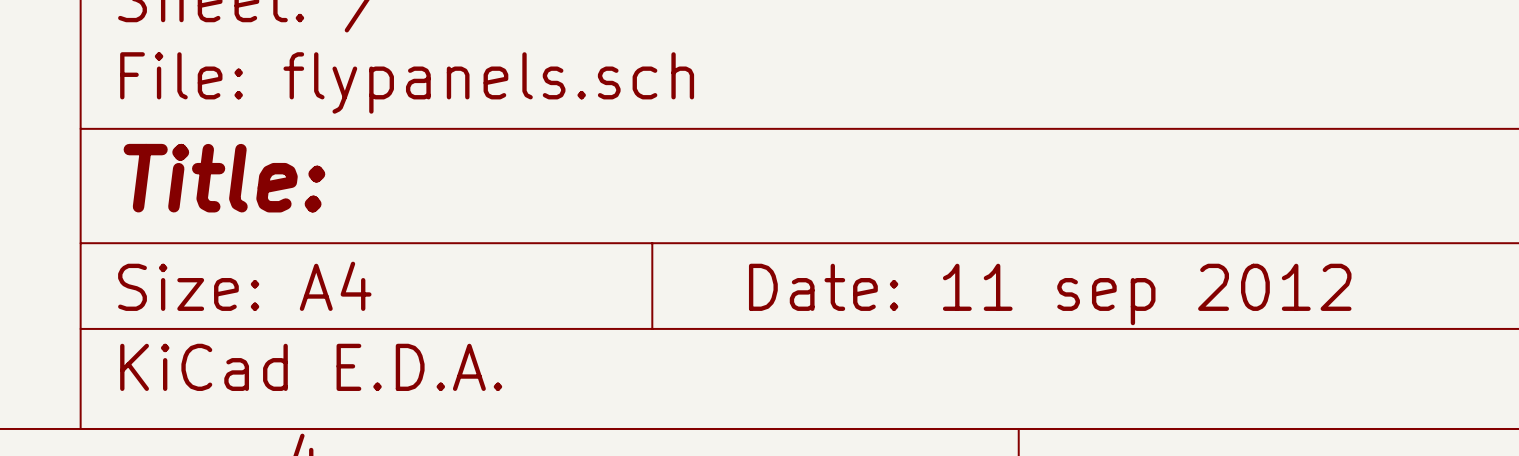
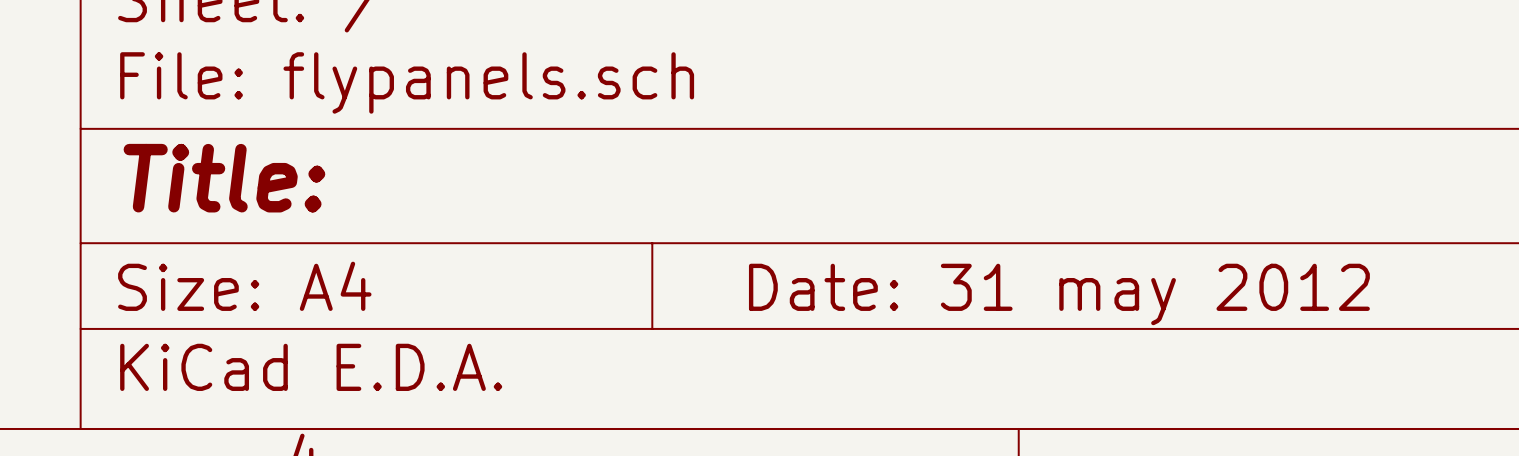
title block: Date: 11 sep 2012 (1050, 294) -> Date: 31 may 2012 (1059, 294)

